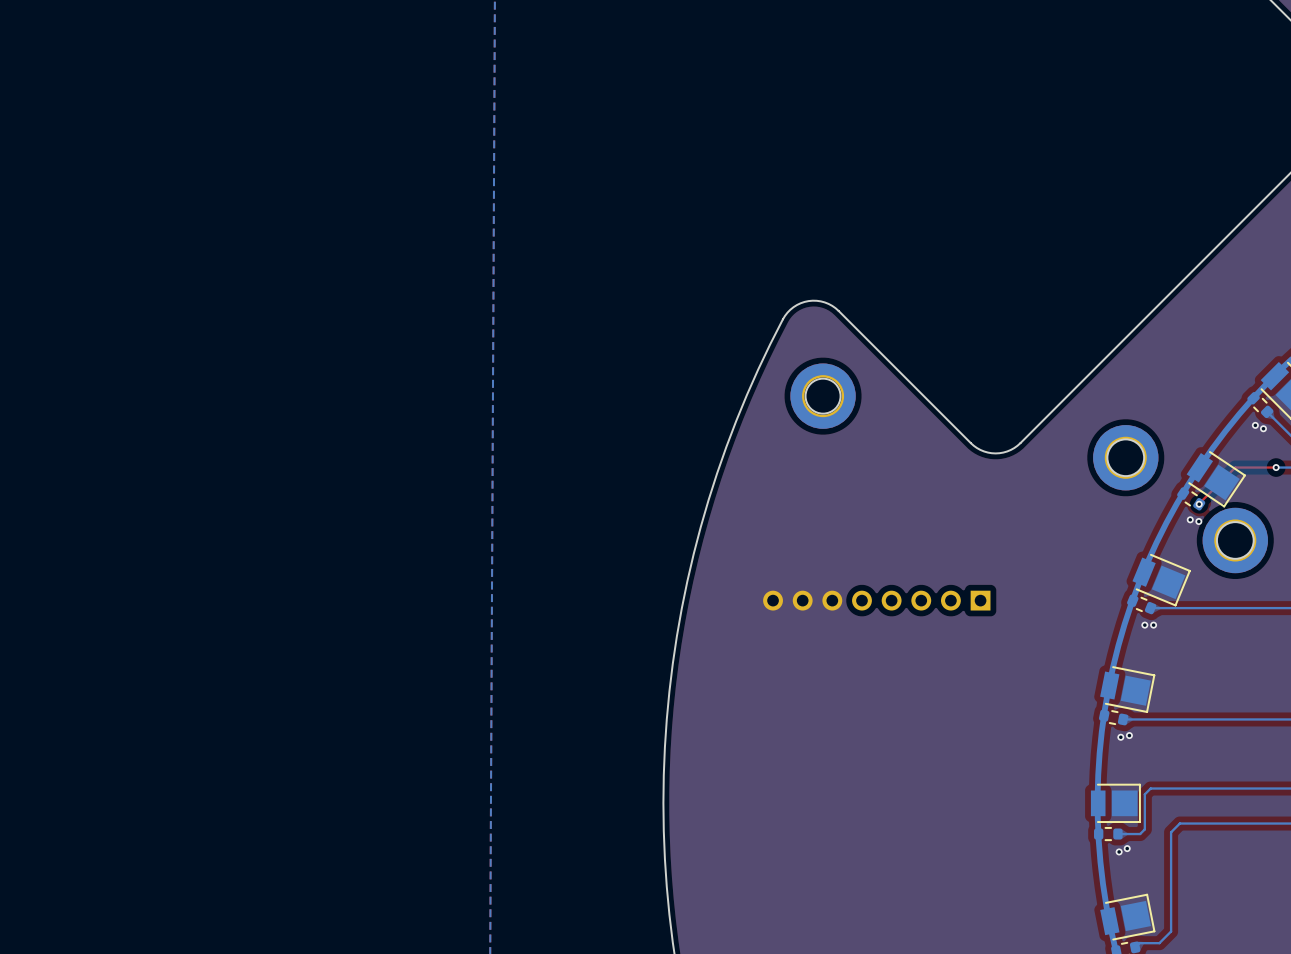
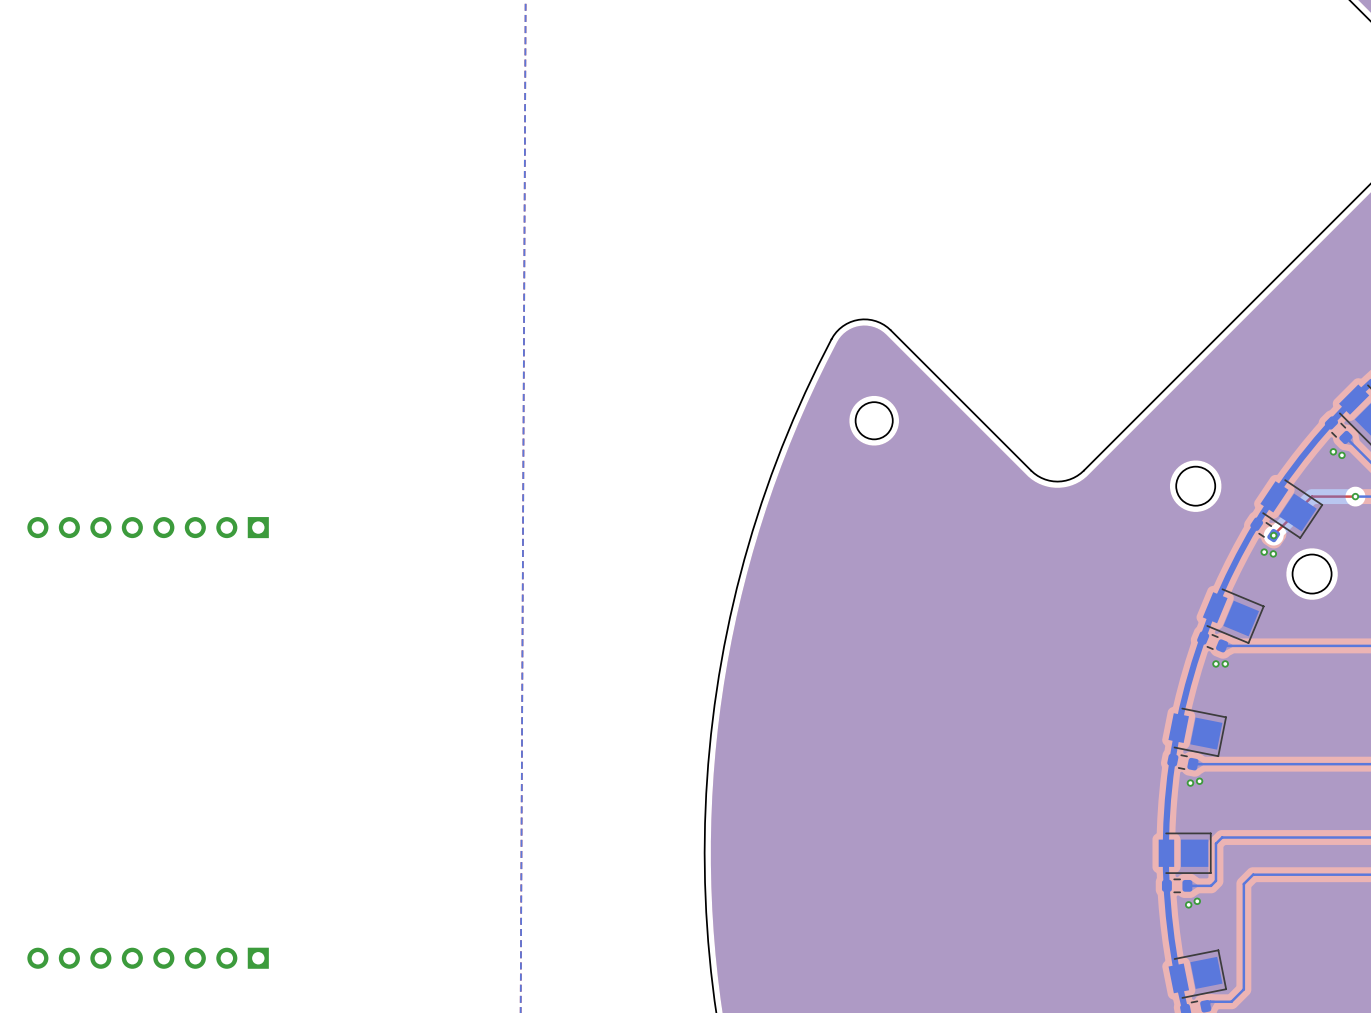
part: (823, 396) -> none
part: (1125, 457) -> none
part: none -> (148, 527)
part: (1235, 540) -> none
part: (876, 600) -> none
part: none -> (148, 958)

